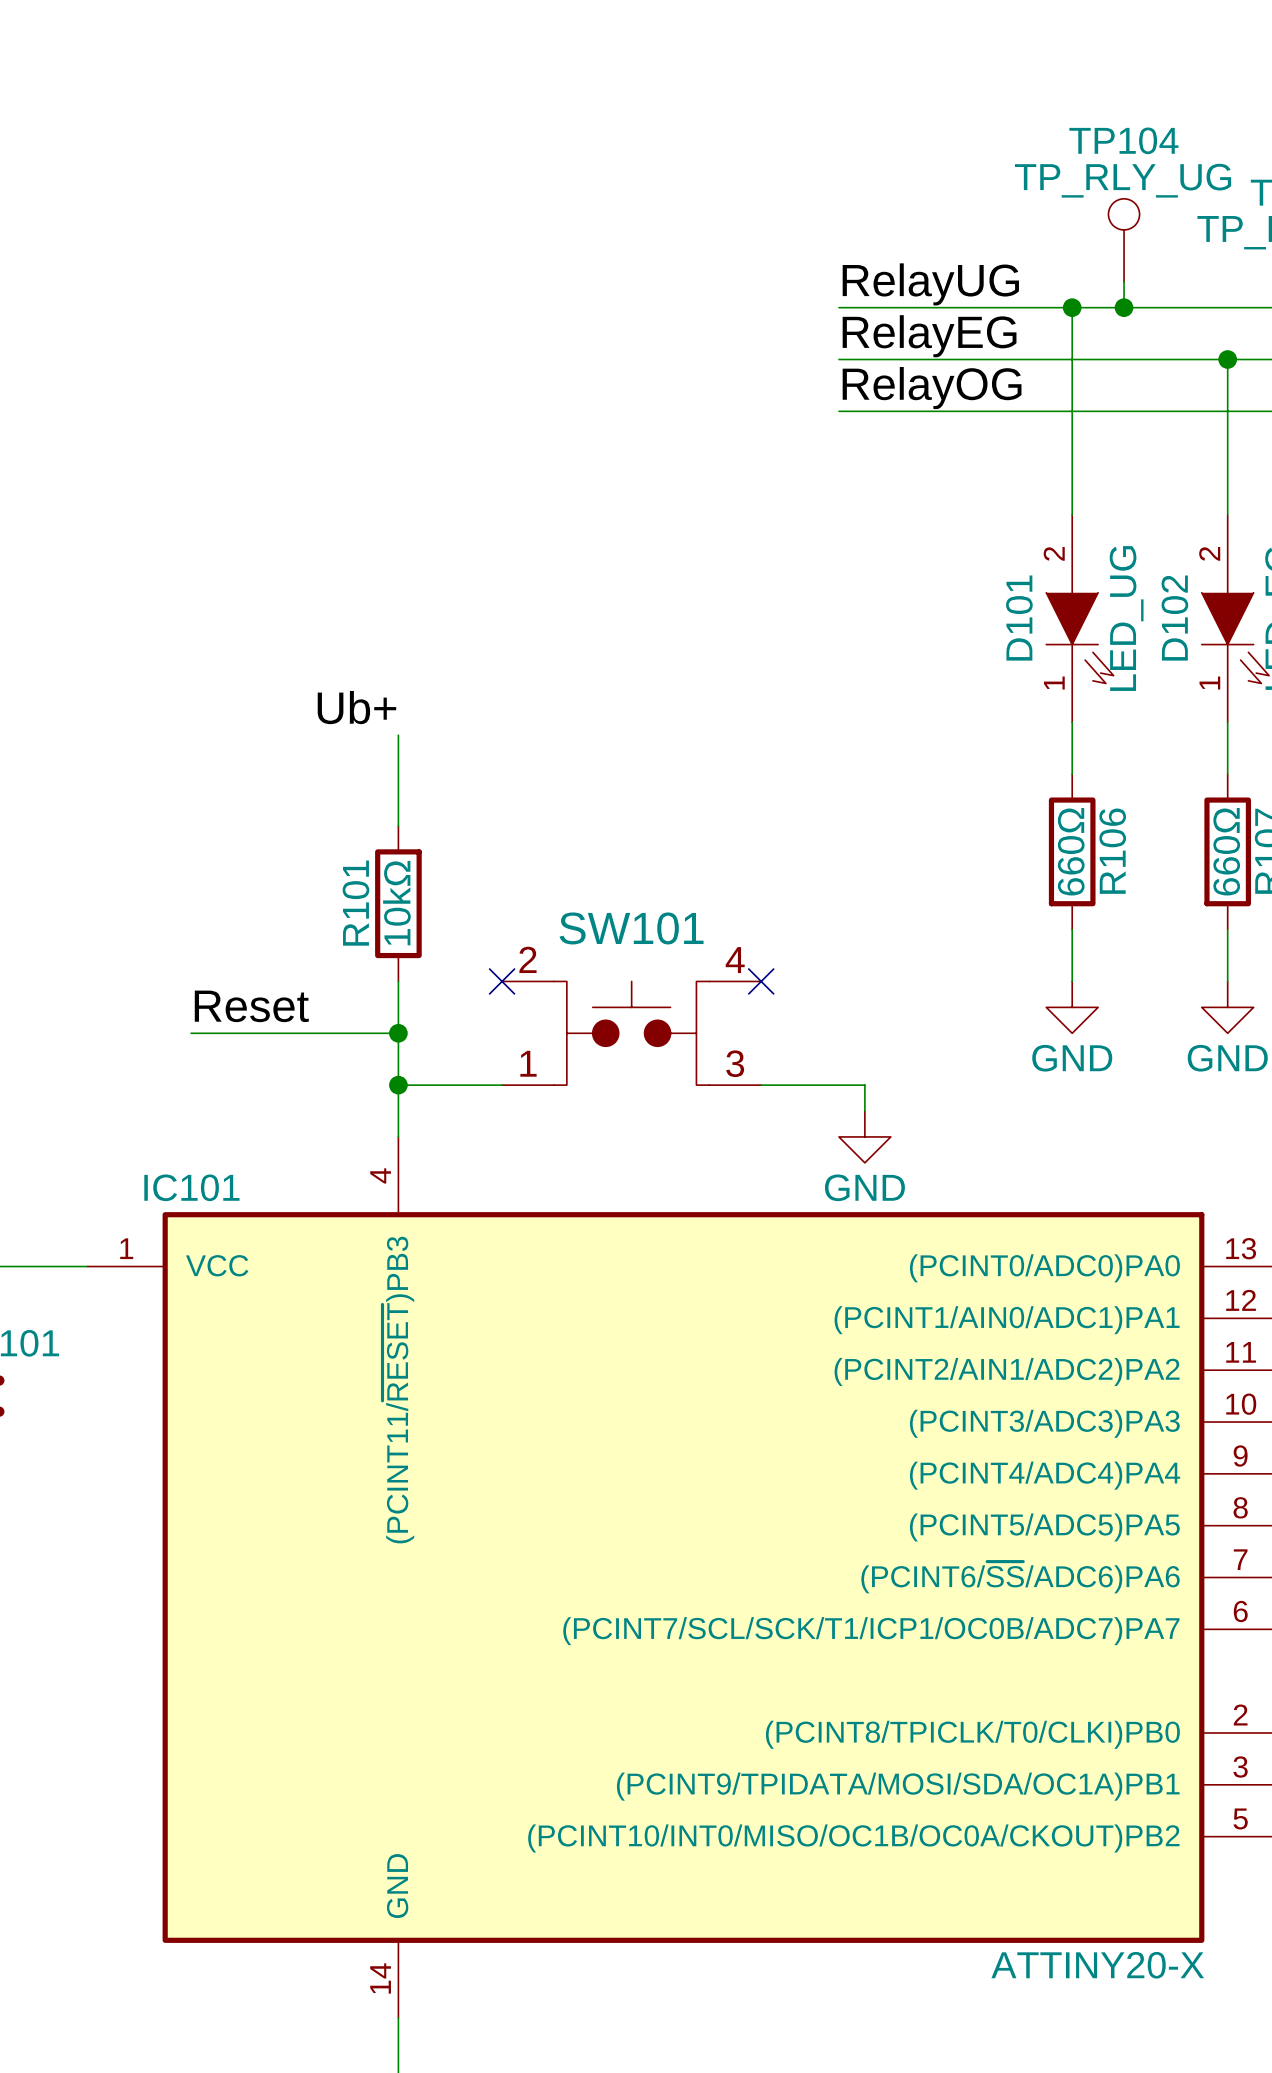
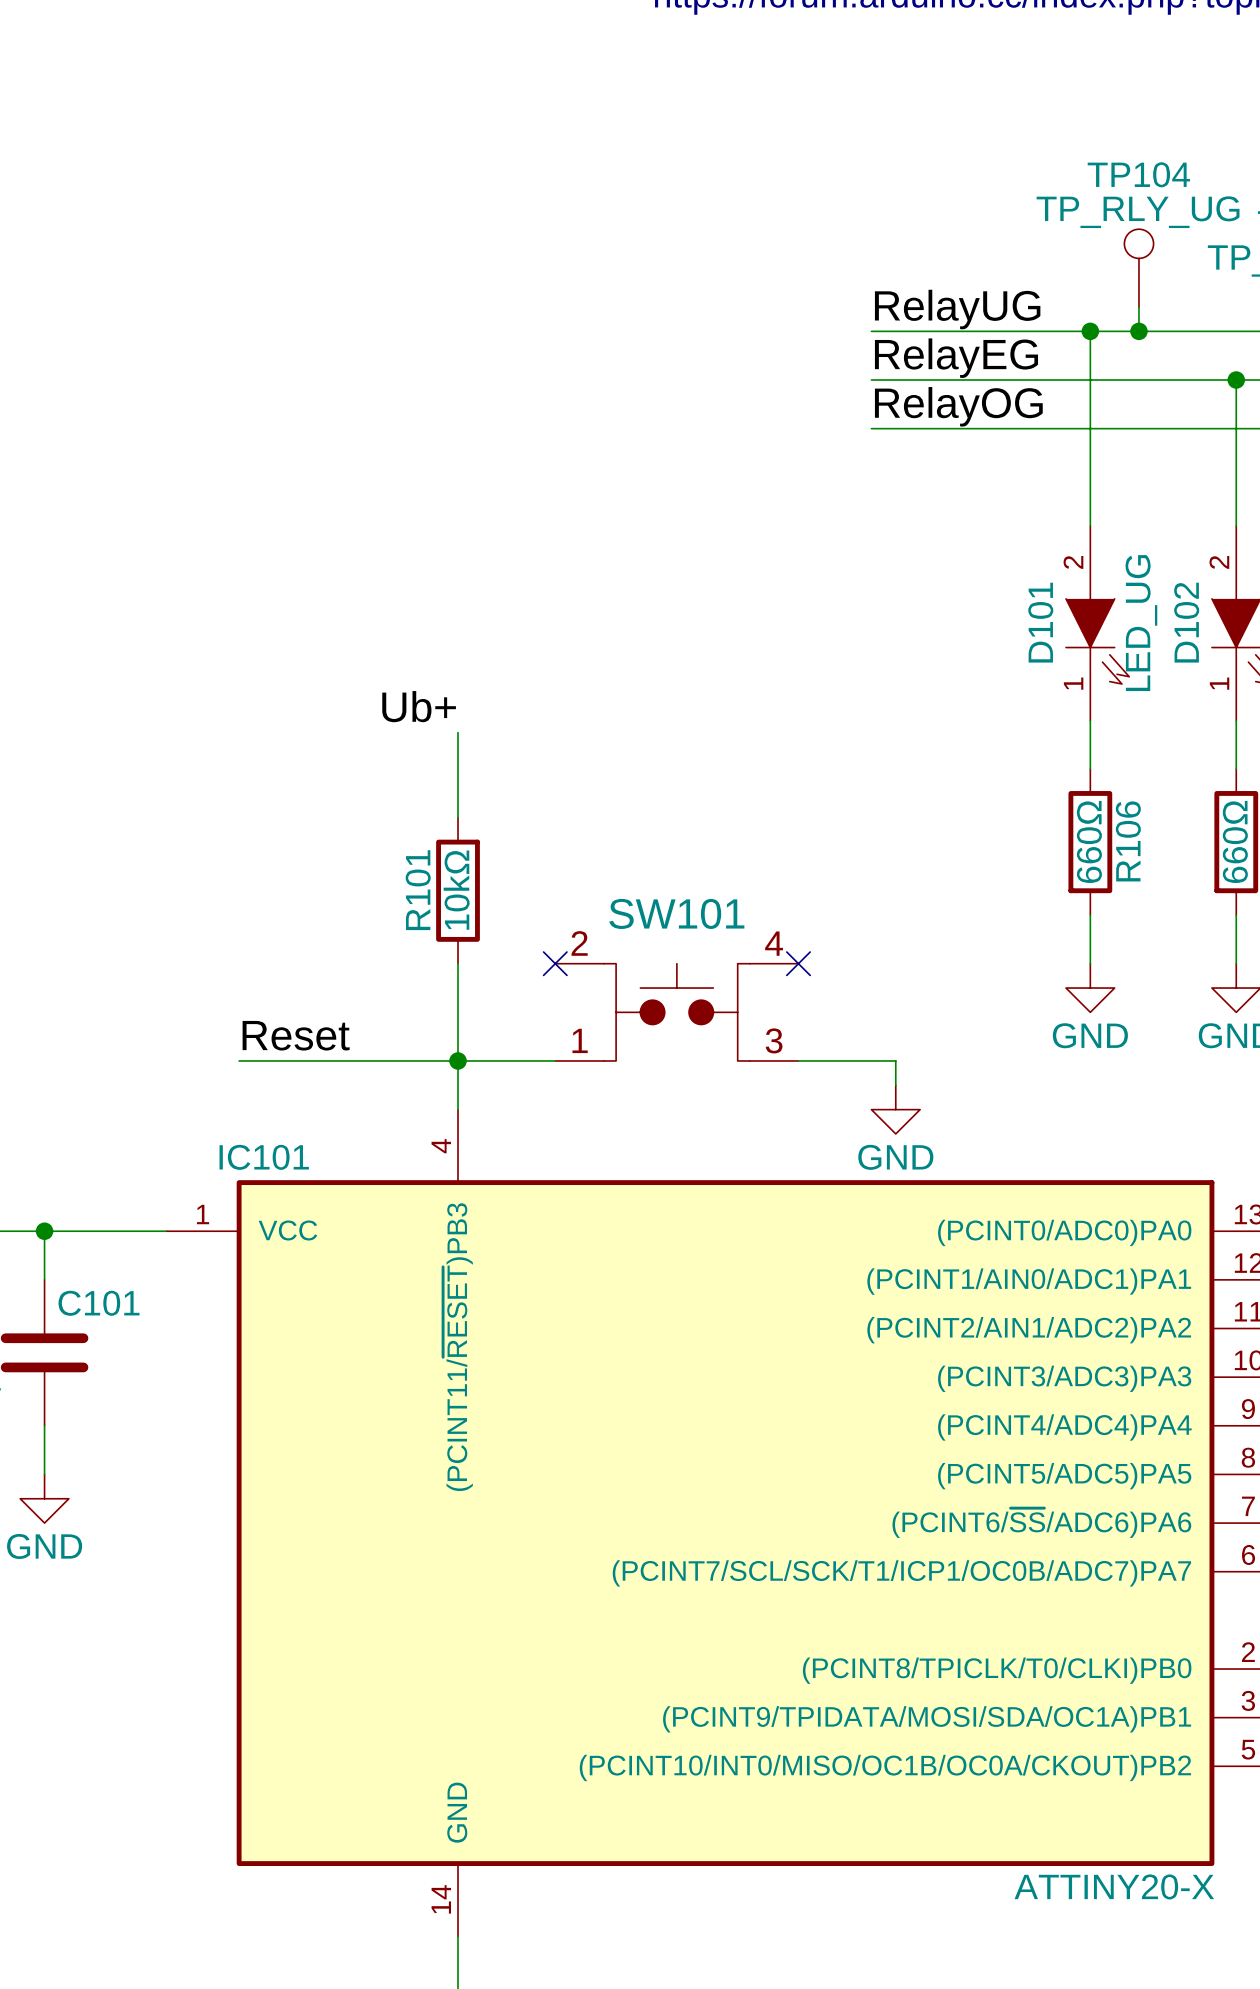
label position: Reset (251, 1006) -> Reset (296, 1035)
wire: (191, 1033) (398, 1033) -> none
junction: (398, 1033) -> none
wire: none -> (239, 1060) (458, 1060)

